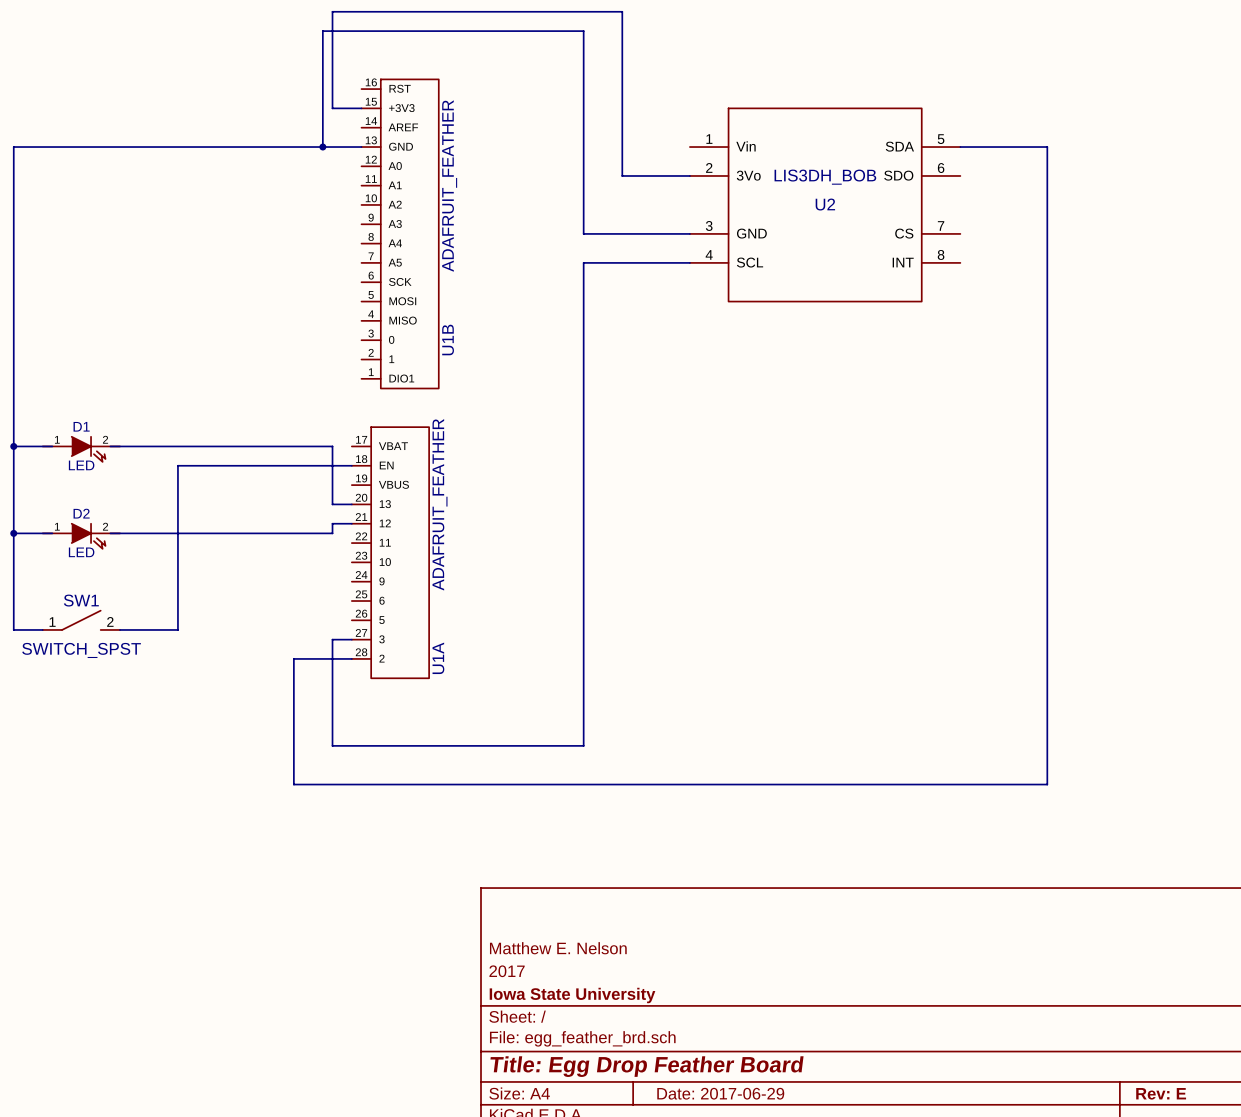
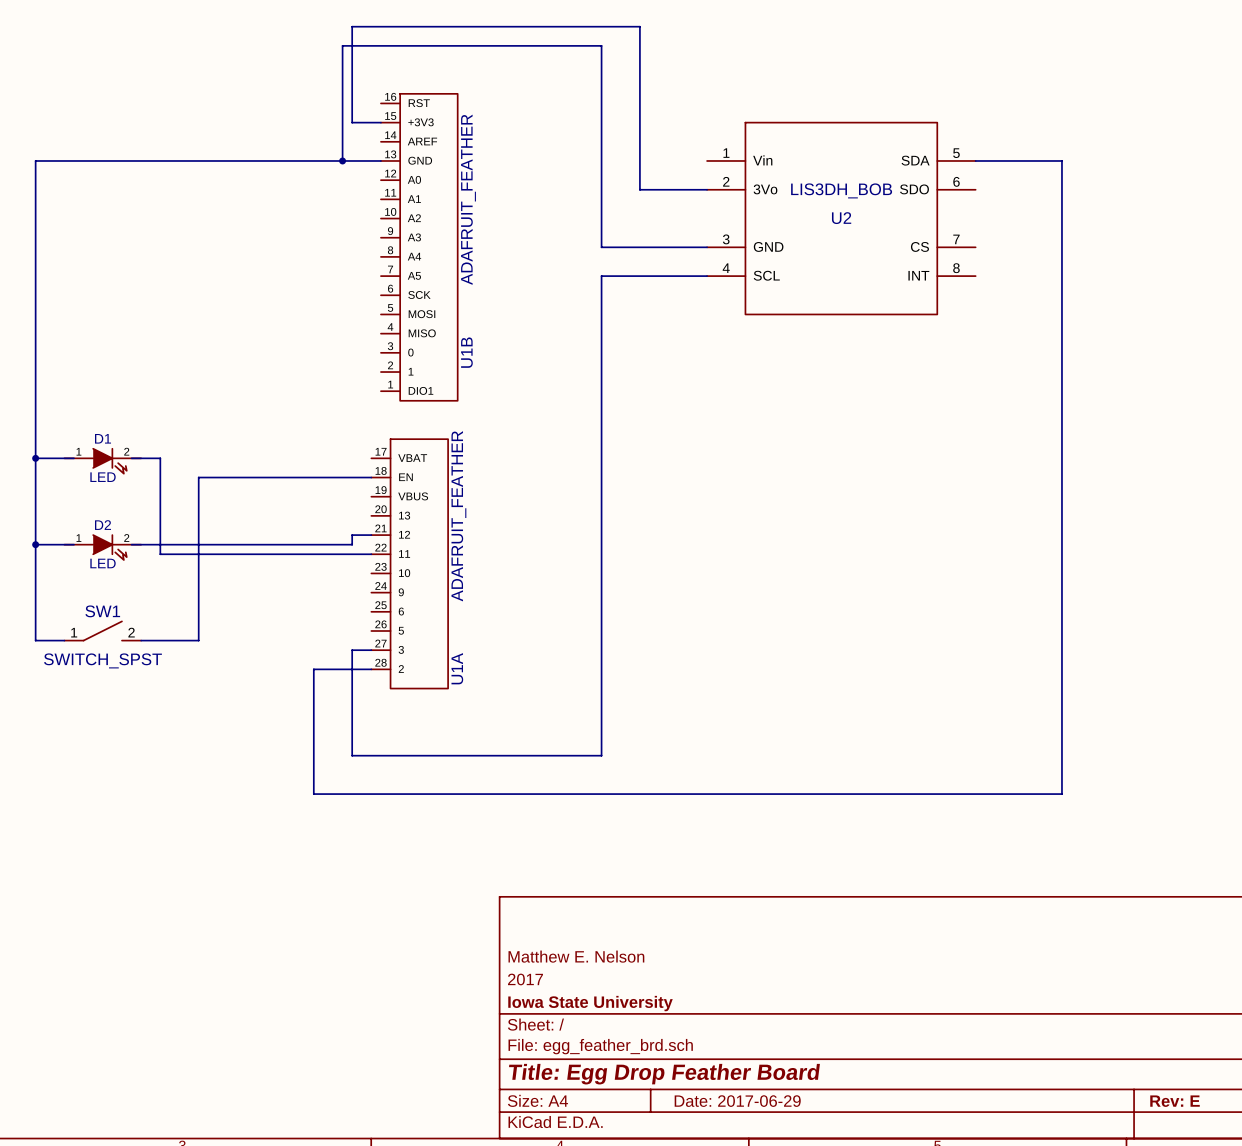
wire: (139, 446) (332, 446) (332, 504) (351, 504) -> (160, 458) (160, 554) (371, 554)

